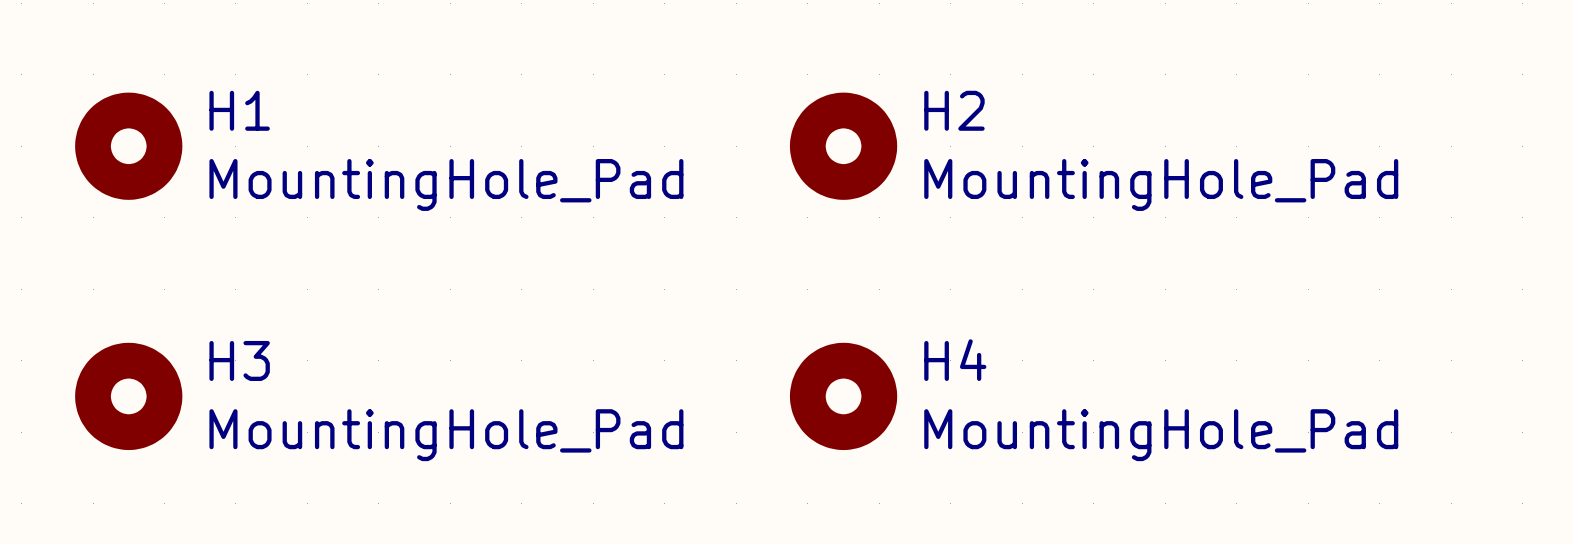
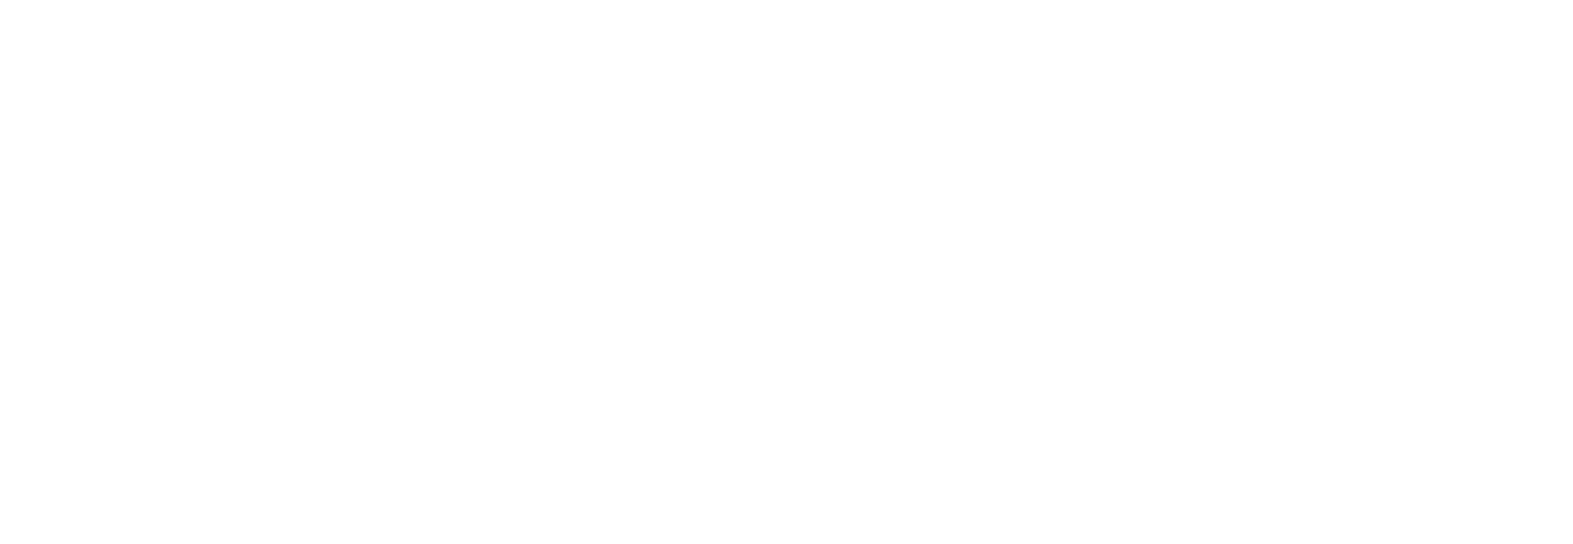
H1: MountingHole_Pad (128, 146) -> none
H2: MountingHole_Pad (843, 146) -> none
H3: MountingHole_Pad (128, 396) -> none
H4: MountingHole_Pad (843, 396) -> none

